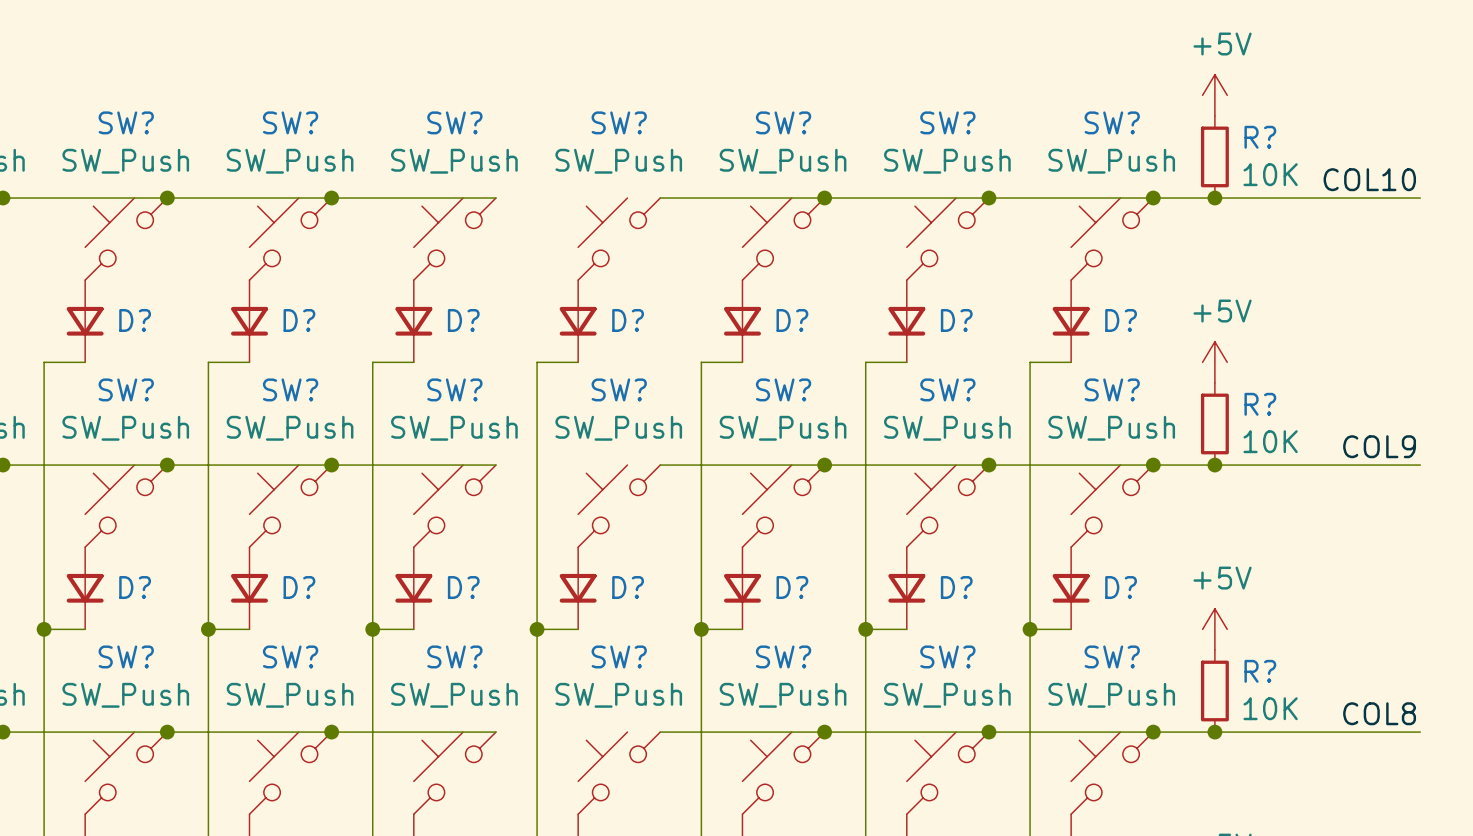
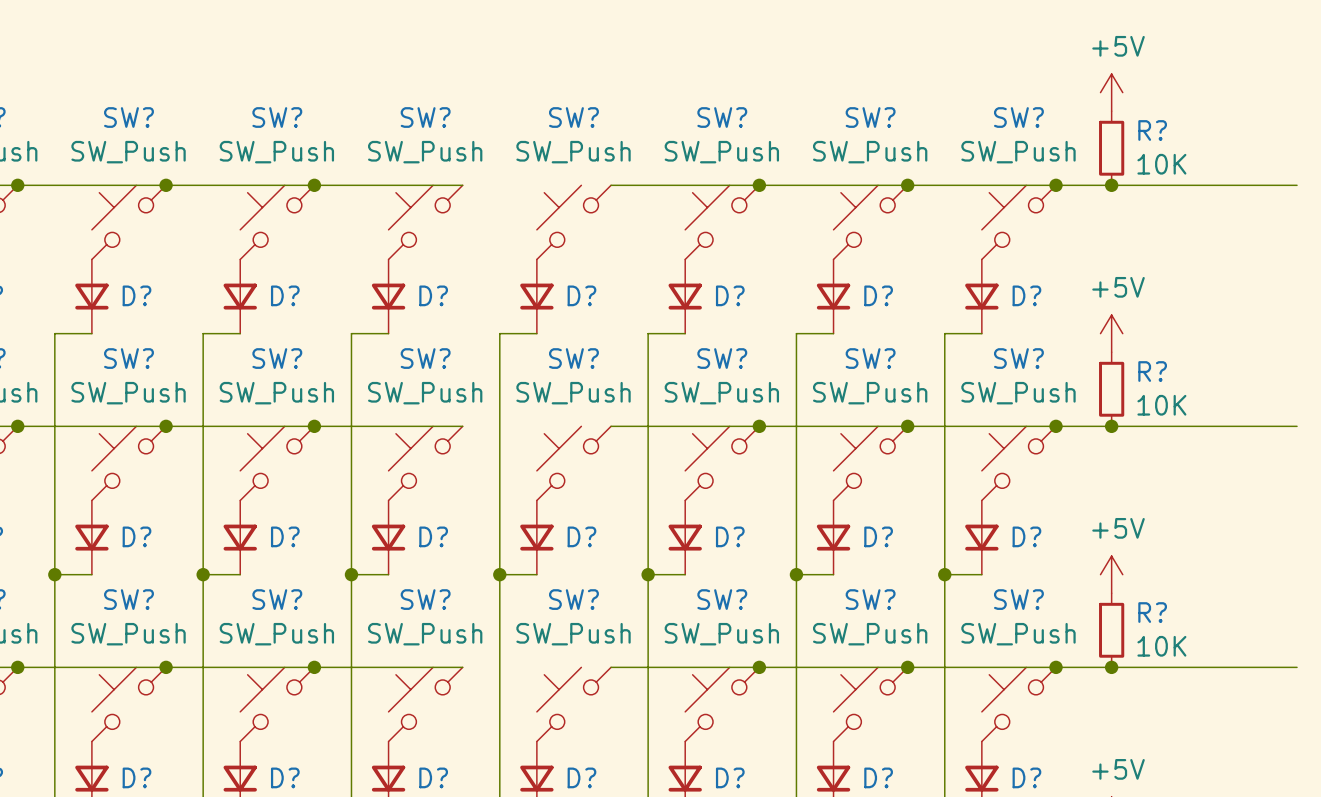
label: COL10 (1369, 179) -> none
label: COL9 (1379, 446) -> none
label: COL8 (1379, 713) -> none

